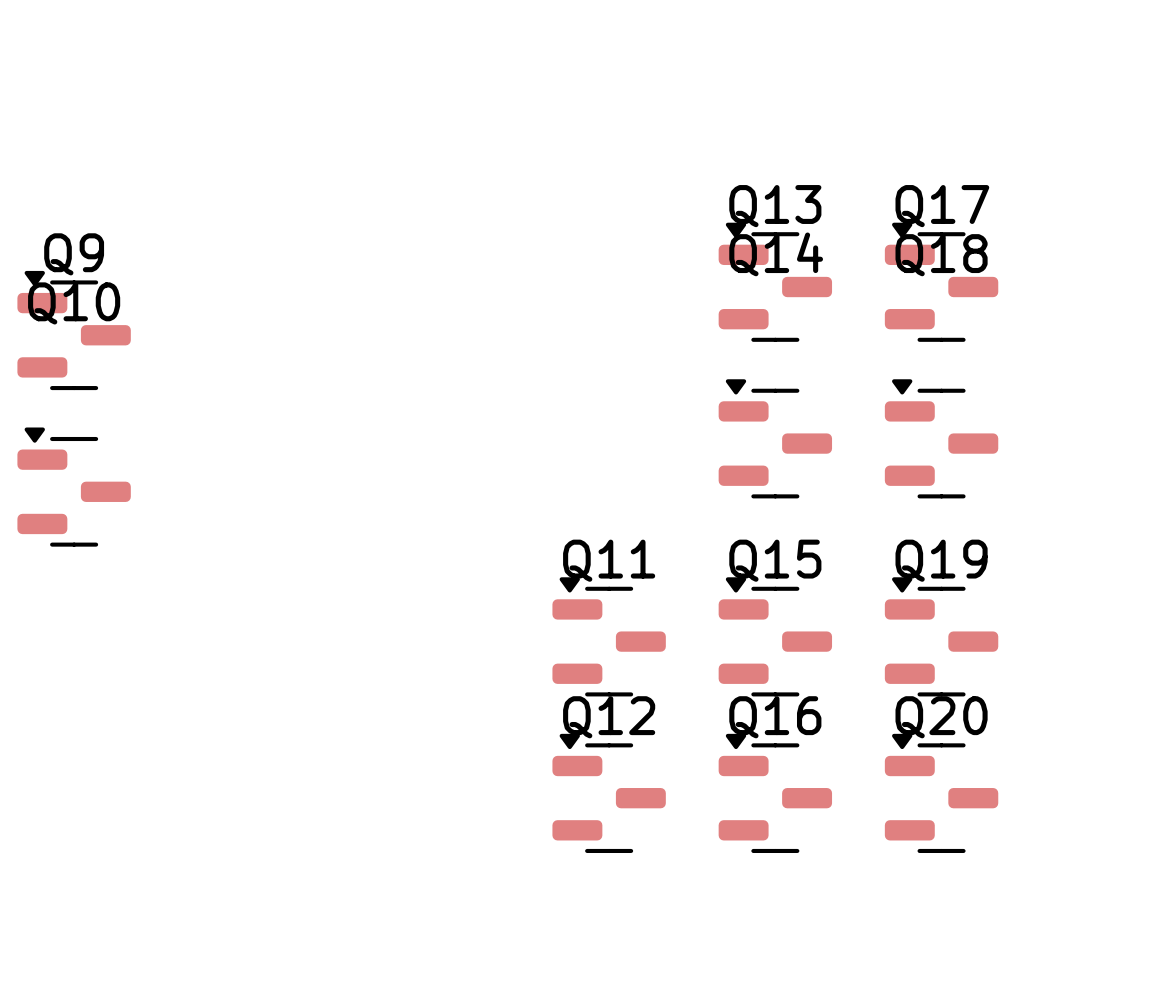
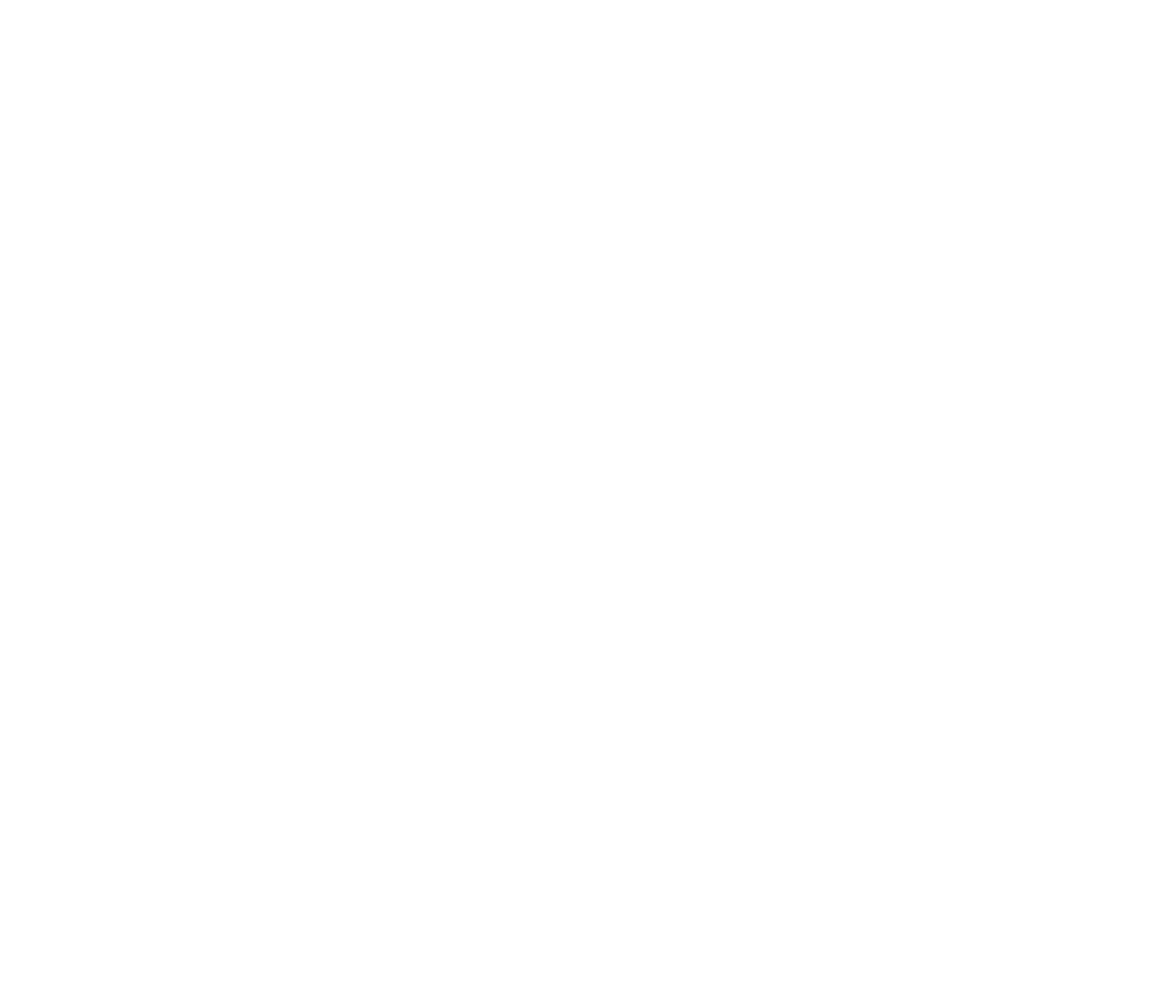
Q13: (775, 282) -> none
Q17: (941, 282) -> none
Q9: (74, 330) -> none
Q14: (775, 438) -> none
Q18: (941, 438) -> none
Q10: (74, 487) -> none
Q11: (609, 636) -> none
Q15: (775, 636) -> none
Q19: (941, 636) -> none
Q12: (609, 793) -> none
Q16: (775, 793) -> none
Q20: (941, 793) -> none

